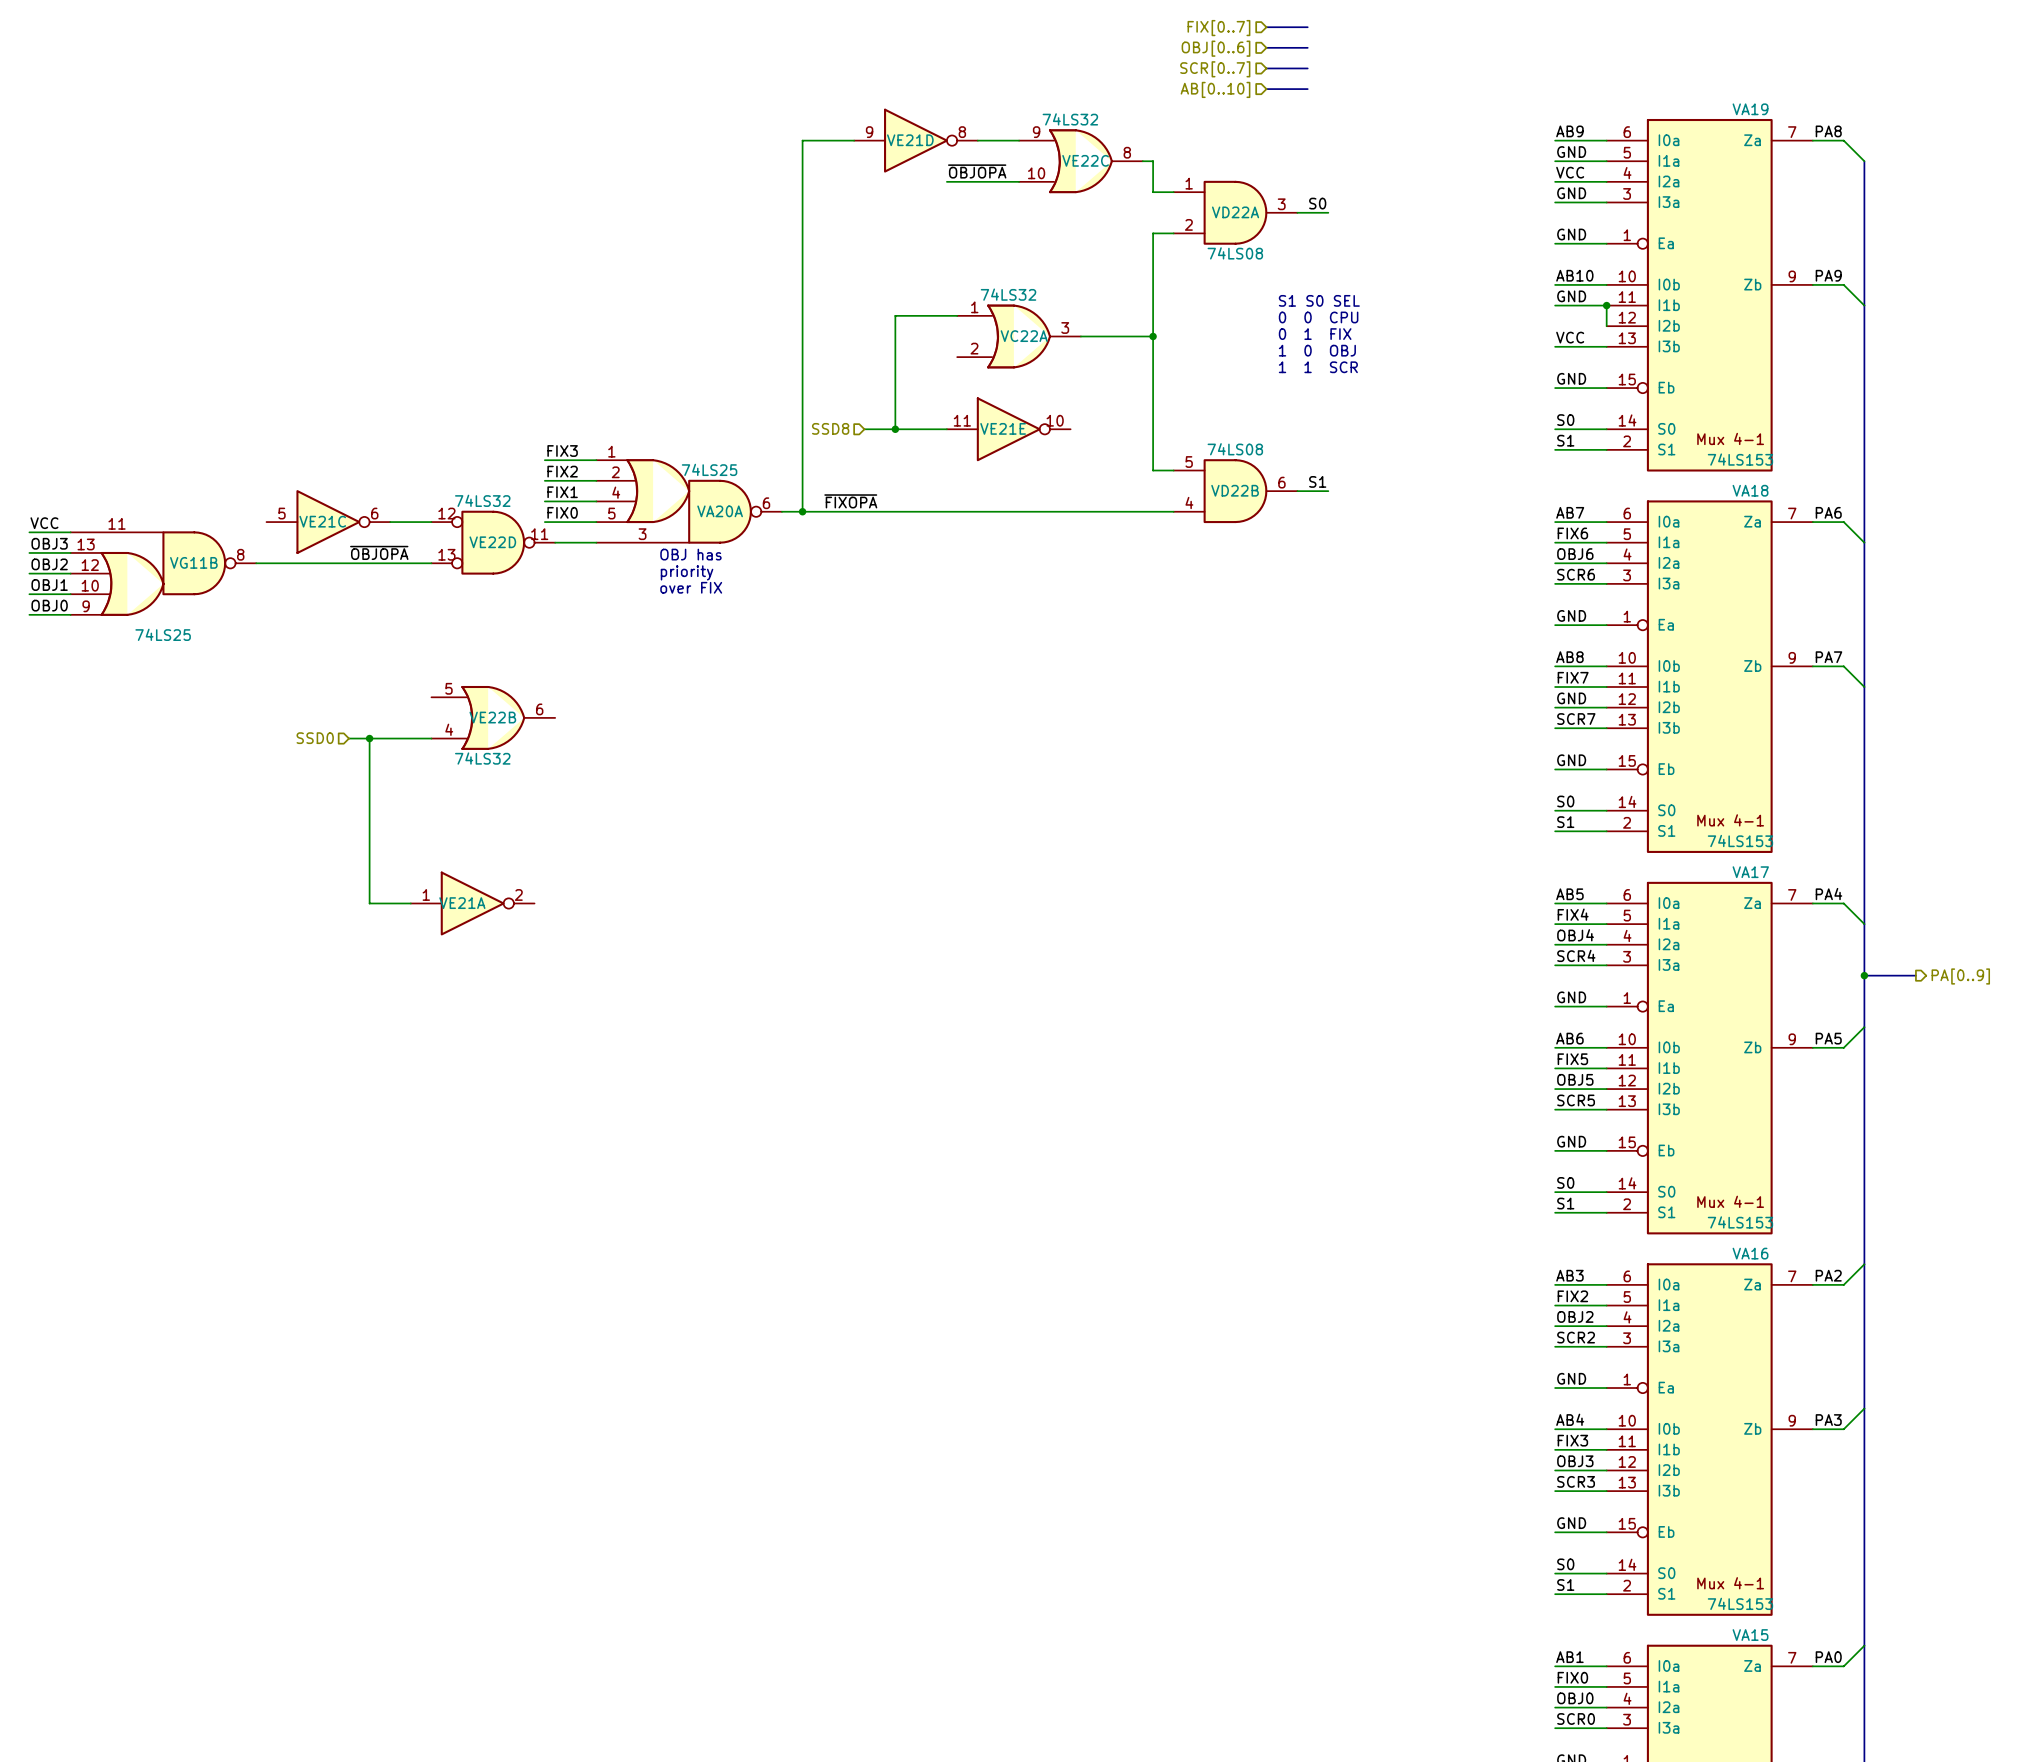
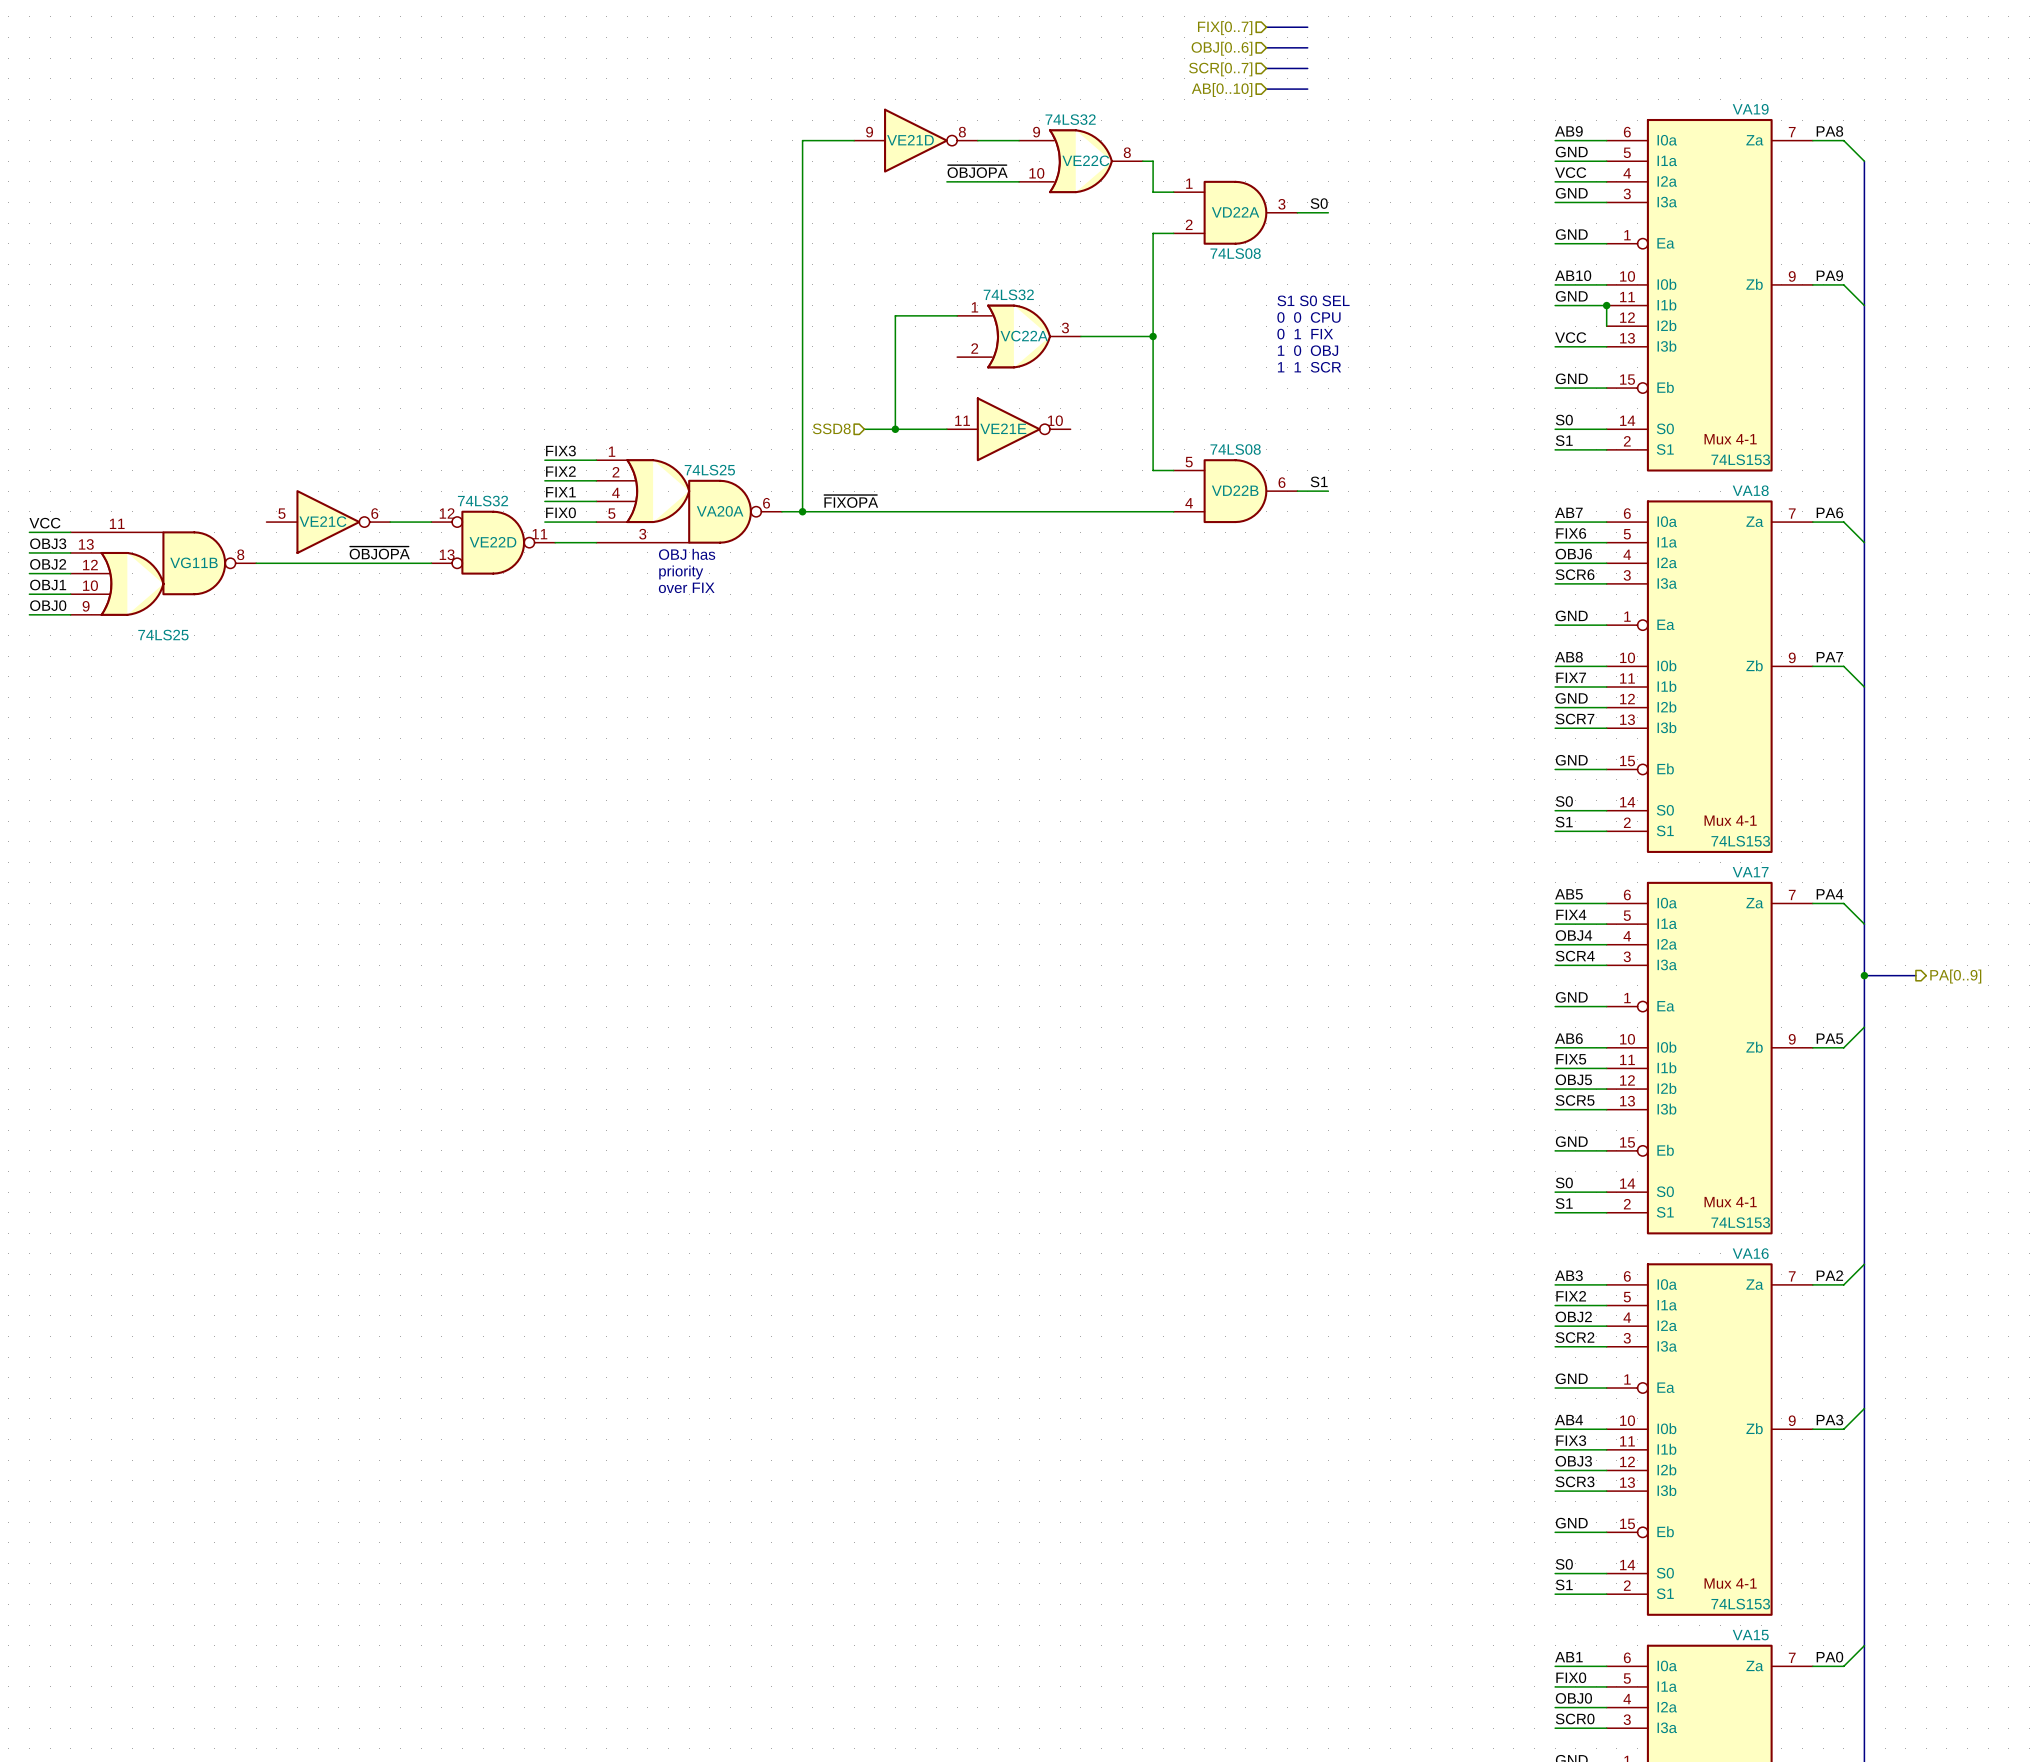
VE22B: 74LS32 (493, 717) -> none
hierarchical label: SSD0 (315, 738) -> none
wire: (348, 738) (431, 738) -> none
wire: (369, 738) (369, 903) (410, 903) -> none
junction: (369, 738) -> none
VE21A: (472, 903) -> none

